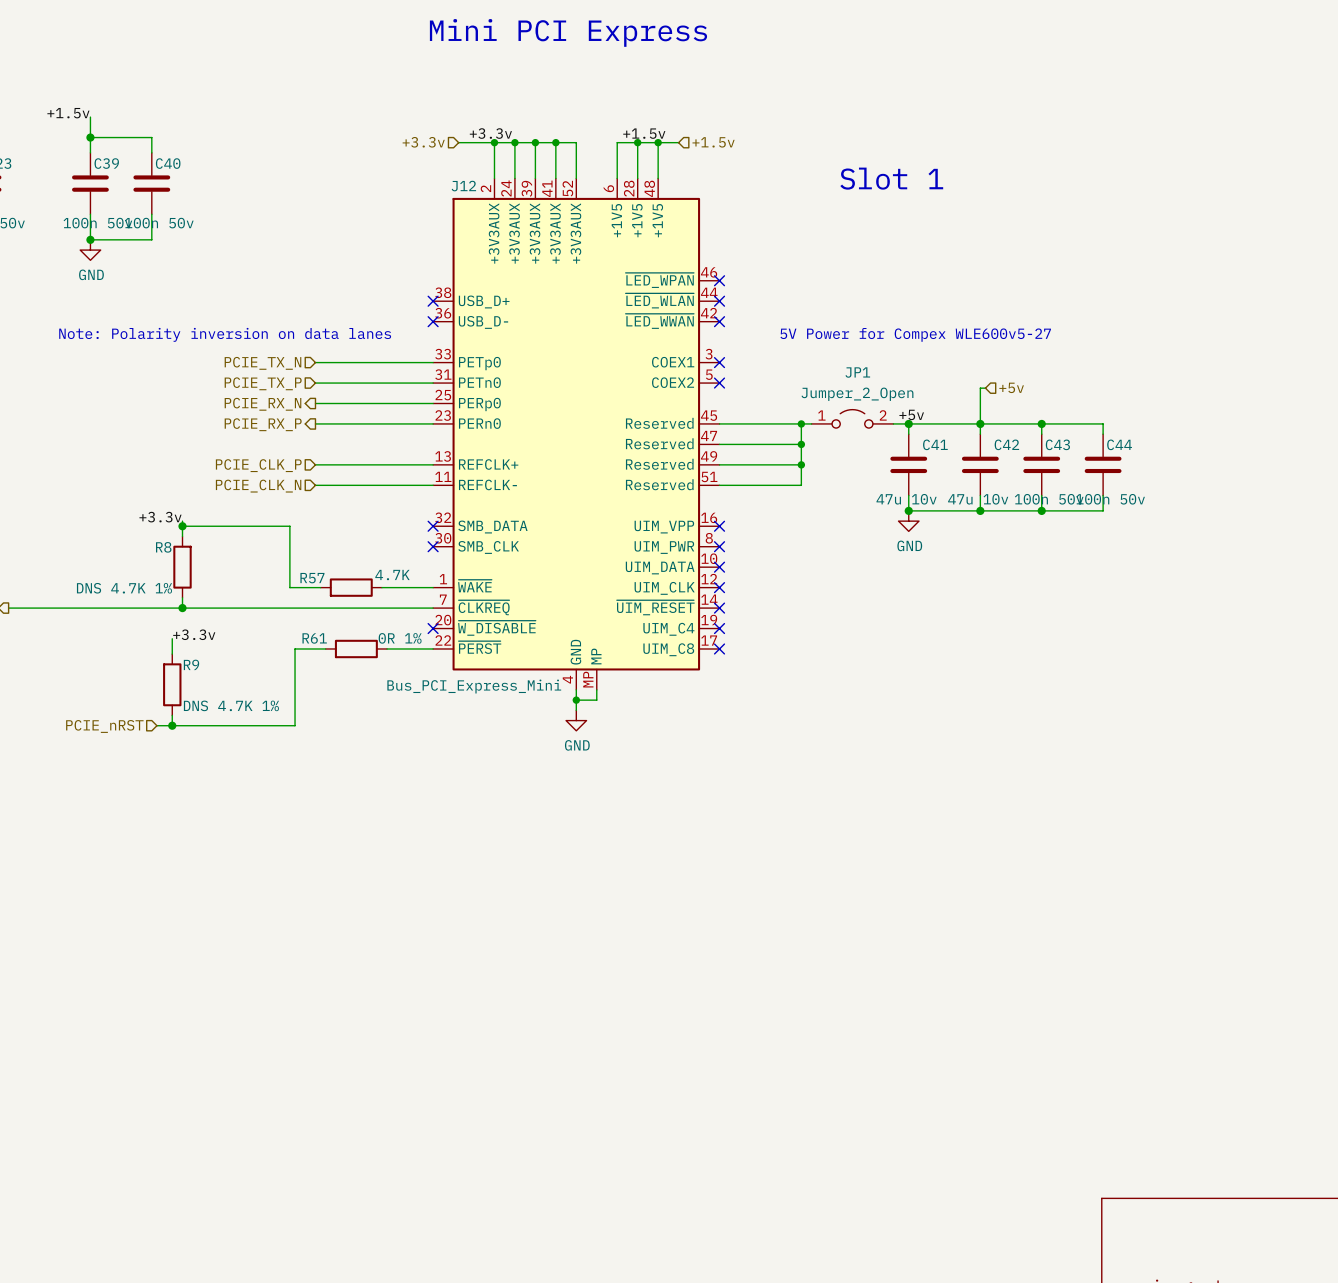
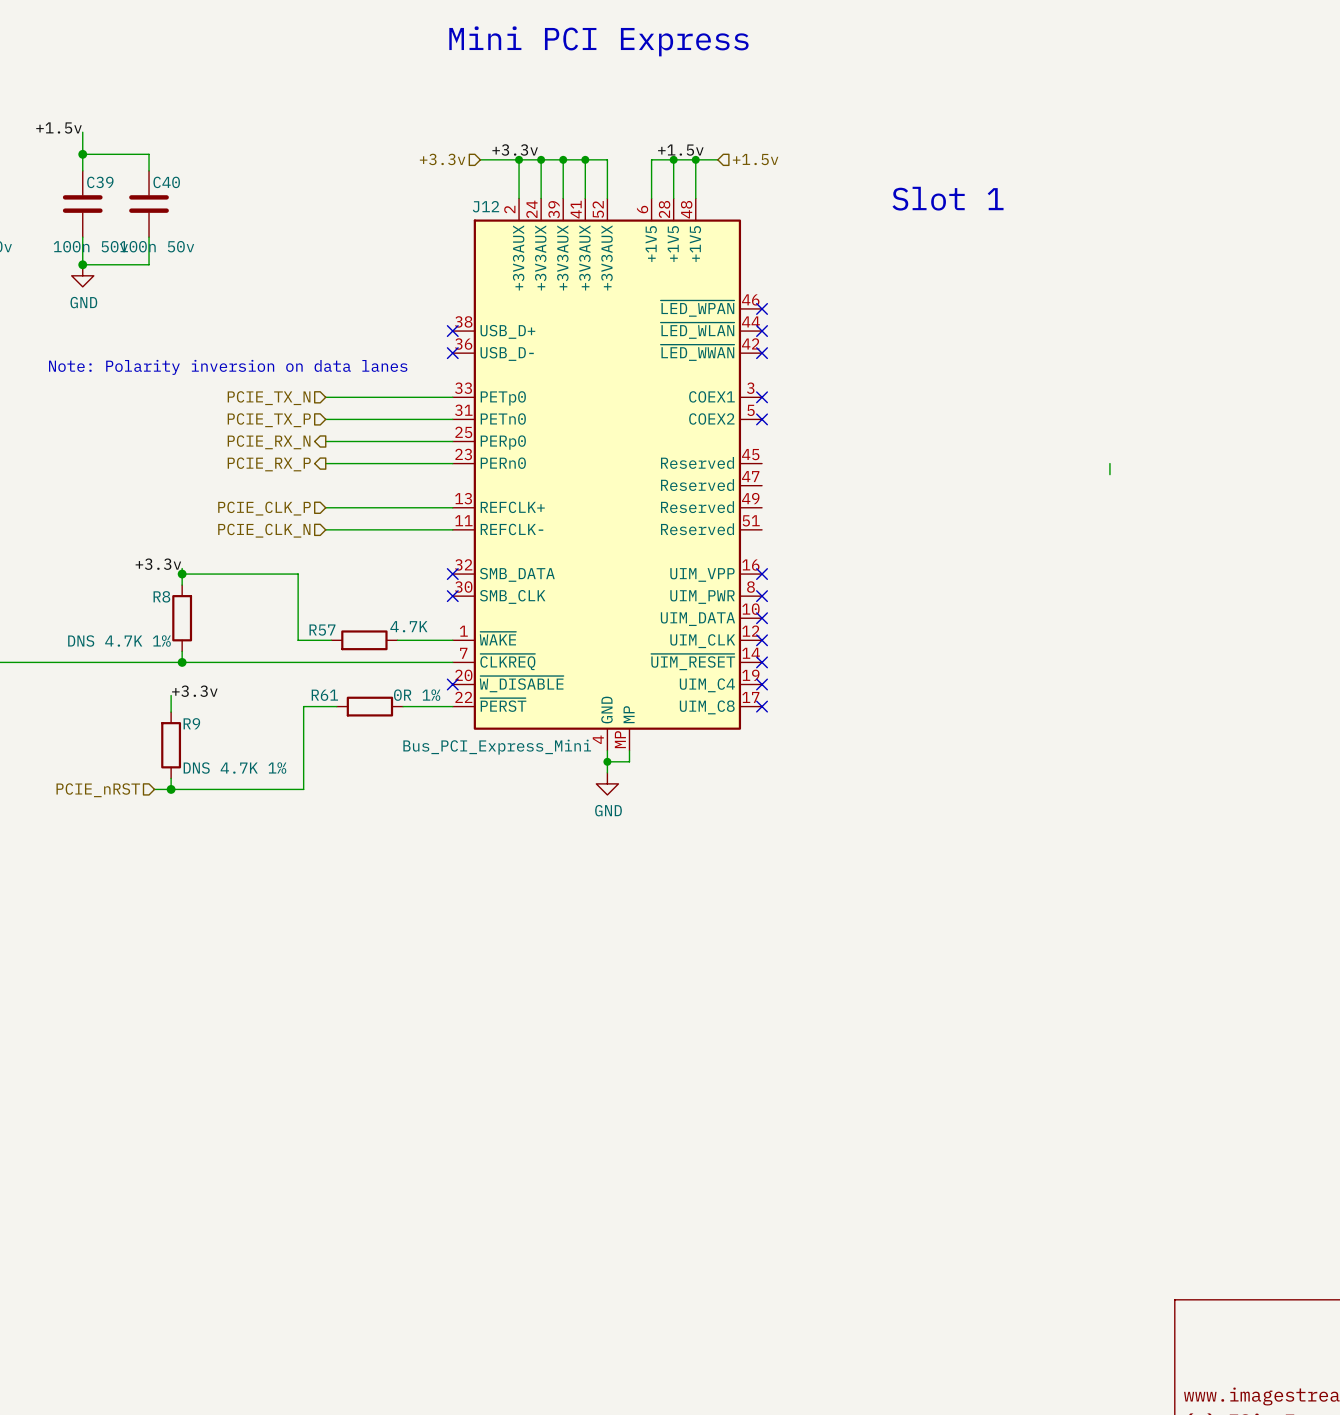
text: 5V Power for Compex WLE600v5-27 (915, 334) -> none
hierarchical label: +5v (1011, 387) -> none
wire: (985, 388) (980, 388) (980, 434) -> none
label: +5v (911, 414) -> none
JP1: Jumper_2_Open (852, 418) -> none
wire: (719, 423) (811, 423) -> none
wire: (801, 423) (801, 485) (719, 485) -> none
junction: (801, 423) -> none
wire: (893, 423) (1103, 423) (1103, 434) -> none
wire: (908, 423) (908, 434) -> none
junction: (908, 423) -> none
junction: (980, 423) -> none
junction: (1041, 423) -> none
wire: (719, 444) (801, 444) -> none
junction: (801, 444) -> none
wire: (719, 464) (801, 464) -> none
junction: (801, 464) -> none
C41: 47u 10v (908, 464) -> none
C42: 47u 10v (980, 464) -> none
C43: 100n 50v (1041, 464) -> none
C44: 100n 50v (1103, 464) -> none
wire: (908, 495) (908, 510) (1103, 510) (1103, 495) -> none
wire: (980, 495) (980, 510) -> none
wire: (1041, 495) (1041, 510) -> none
junction: (908, 510) -> none
junction: (980, 510) -> none
junction: (1041, 510) -> none
power symbol: GND (908, 521) -> none

